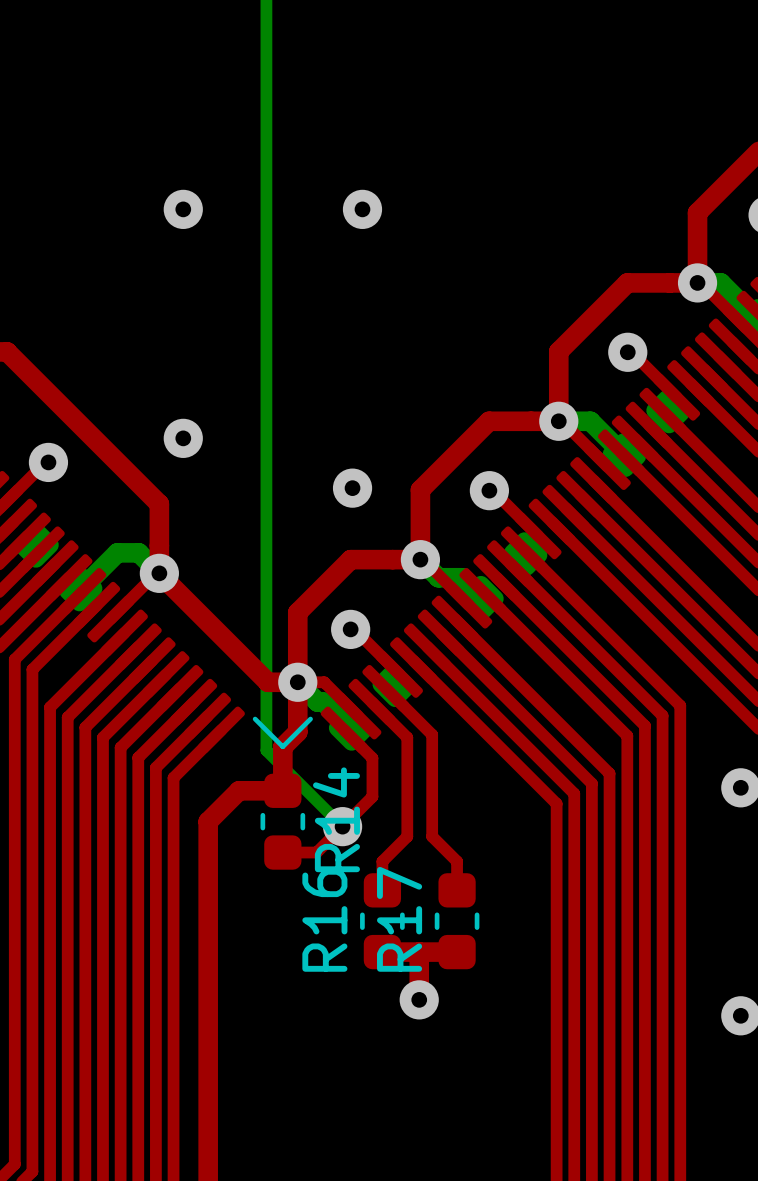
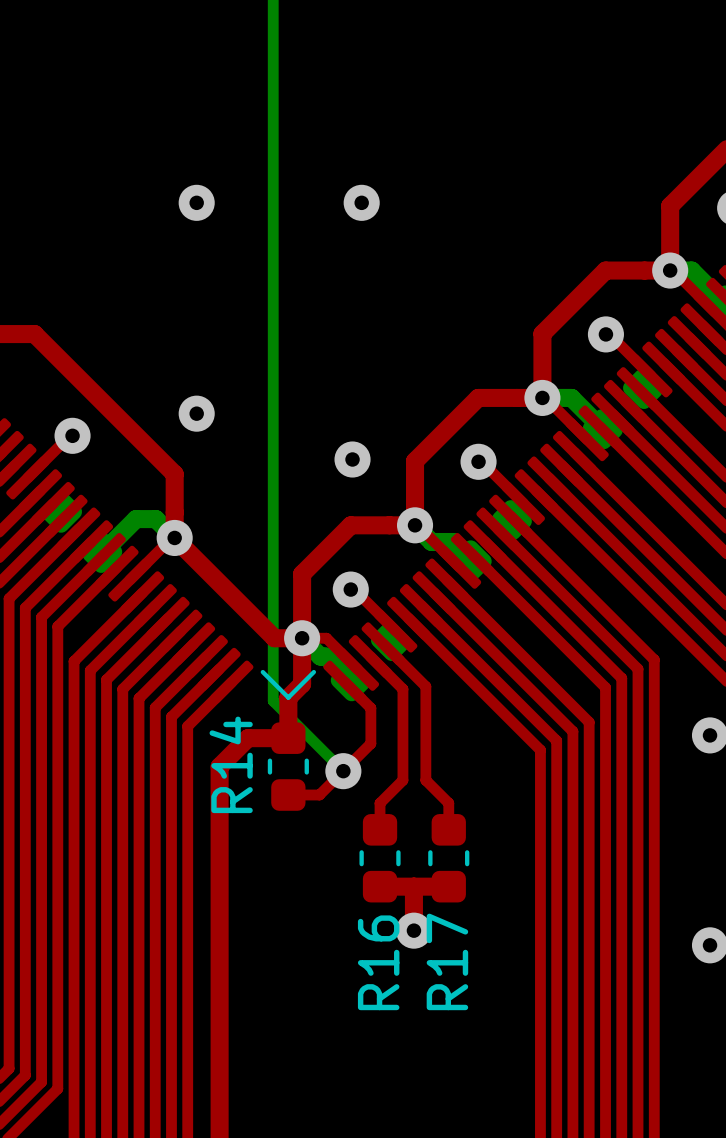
R14 name position: R14 (336, 819) -> R14 (231, 764)
R17 name position: R17 (399, 919) -> R17 (447, 961)
R16 name position: R16 (324, 920) -> R16 (378, 962)

